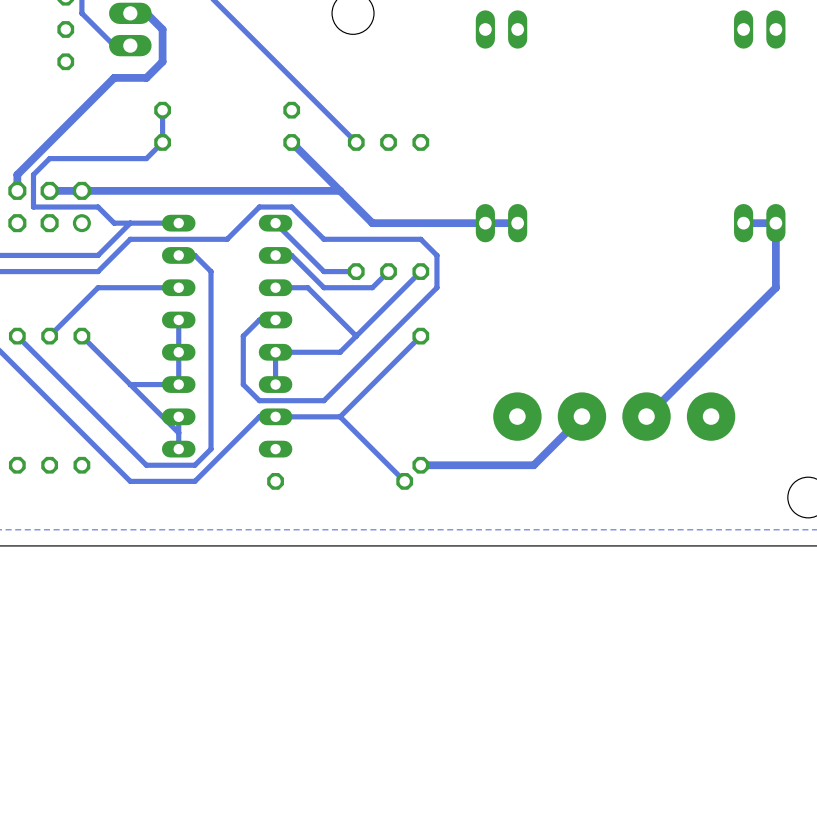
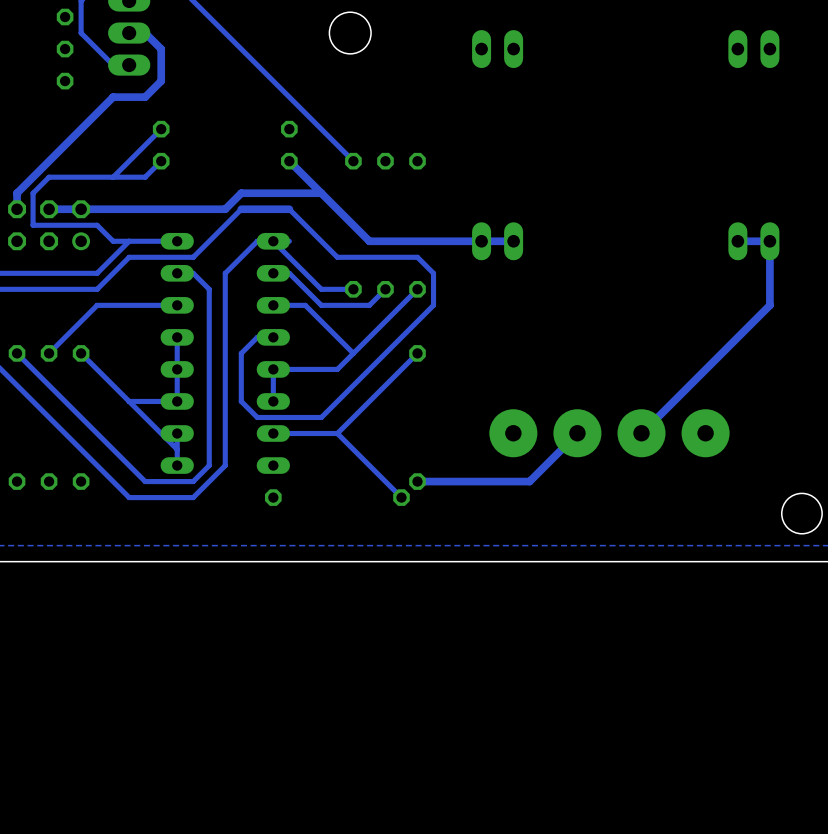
bottom track: (162, 110) (162, 142) -> (161, 129) (113, 177)
bottom track: none -> (321, 193) (241, 193) (225, 209)
bottom track: (243, 190) (227, 190) -> (241, 209) (193, 257)
bottom track: (340, 190) (291, 190) -> (337, 257) (289, 209)
bottom track: (340, 239) (323, 239) (291, 207) (259, 207) (227, 239) (194, 239) -> none
bottom track: (275, 416) (259, 416) (227, 449) -> (289, 241) (257, 241) (225, 273) (225, 465)

